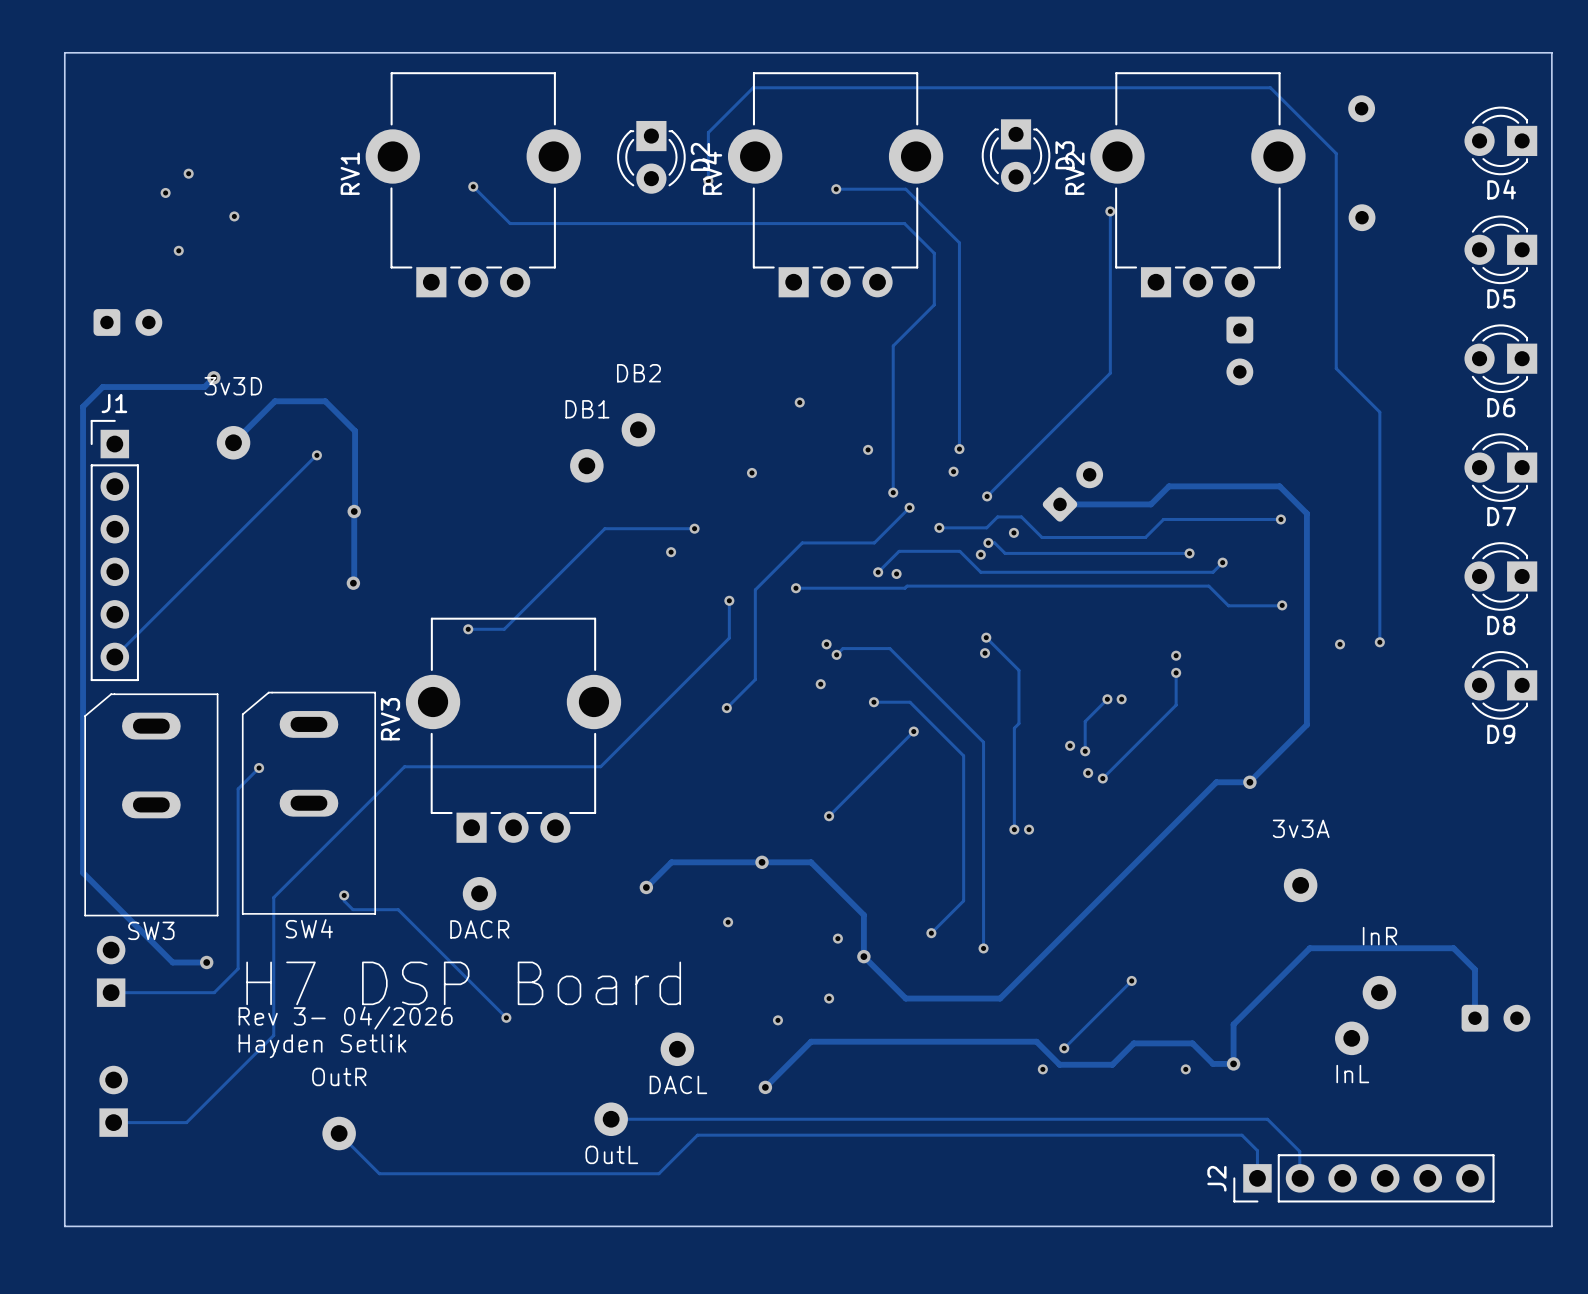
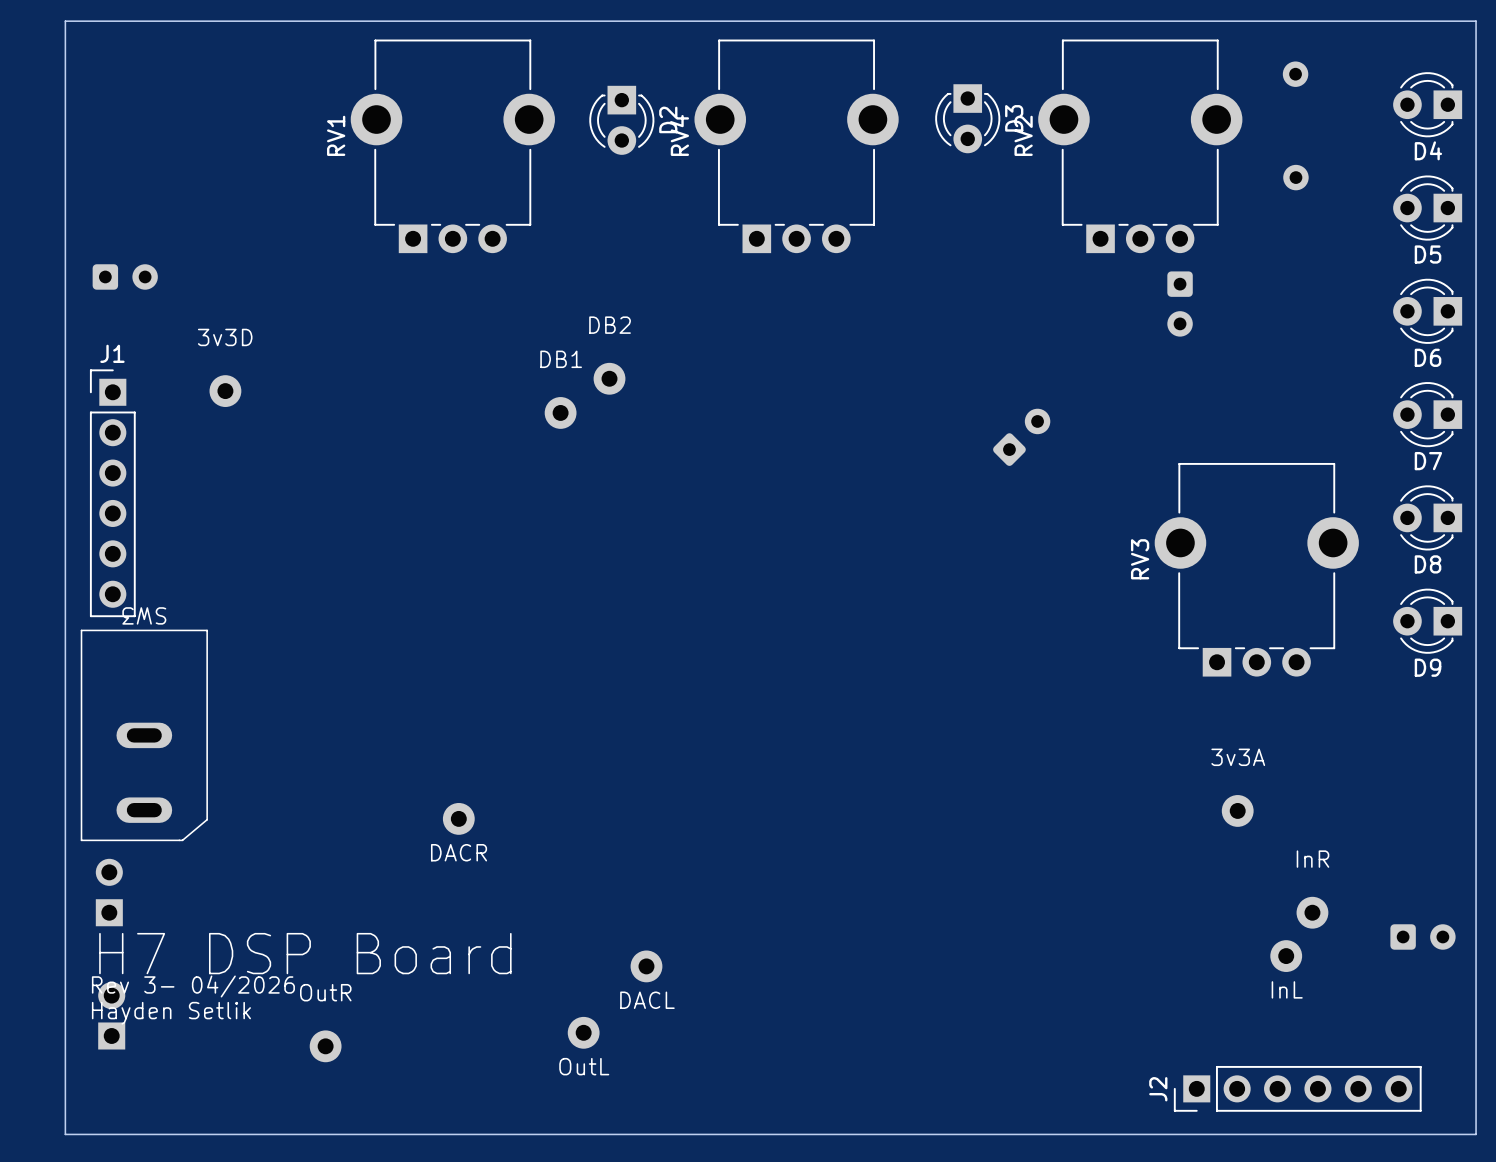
via: (188, 173) -> none
track: (708, 180) (708, 132) (753, 87) (1270, 87) (1336, 153) (1336, 368) (1379, 412) (1379, 642) -> none
via: (708, 180) -> none
track: (473, 186) (510, 223) (904, 223) (934, 253) (934, 304) (893, 345) (893, 492) -> none
via: (473, 186) -> none
track: (836, 189) (905, 189) (959, 242) (959, 449) -> none
via: (836, 189) -> none
via: (165, 192) -> none
track: (1110, 211) (1110, 373) (987, 496) -> none
via: (1110, 211) -> none
via: (234, 216) -> none
via: (178, 250) -> none
track: (213, 377) (204, 387) (102, 387) (83, 406) (83, 872) (172, 962) (206, 962) -> none
via: (213, 377) -> none
via: (799, 402) -> none
track: (233, 442) (275, 401) (325, 401) (355, 431) (353, 583) -> none
via: (868, 449) -> none
via: (959, 449) -> none
track: (316, 455) (114, 656) -> none
via: (316, 455) -> none
via: (953, 471) -> none
via: (751, 472) -> none
via: (893, 492) -> none
via: (987, 496) -> none
track: (1060, 504) (1150, 504) (1169, 486) (1279, 486) (1306, 513) (1306, 724) (1249, 782) (1216, 782) (1000, 998) (905, 998) (863, 956) (863, 915) (811, 862) (671, 862) (646, 887) -> none
track: (909, 507) (874, 542) (802, 542) (755, 589) (755, 679) (726, 708) -> none
via: (909, 507) -> none
via: (354, 511) -> none
track: (1280, 519) (1163, 519) (1145, 537) (1042, 537) (1021, 516) (997, 516) (986, 527) (939, 527) -> none
via: (1280, 519) -> none
via: (939, 527) -> none
track: (694, 528) (604, 528) (504, 629) (468, 629) -> none
via: (694, 528) -> none
via: (1013, 532) -> none
track: (988, 542) (994, 542) (1005, 553) (1189, 553) -> none
via: (988, 542) -> none
via: (671, 552) -> none
via: (1189, 553) -> none
via: (980, 554) -> none
track: (1222, 562) (1213, 572) (980, 572) (959, 551) (899, 551) (878, 572) -> none
via: (1222, 562) -> none
via: (878, 572) -> none
via: (896, 573) -> none
via: (353, 583) -> none
track: (795, 588) (904, 588) (907, 586) (1208, 586) (1228, 605) (1282, 605) -> none
via: (795, 588) -> none
track: (729, 600) (729, 638) (600, 766) (404, 766) (273, 897) (273, 1035) (186, 1122) (113, 1122) -> none
via: (729, 600) -> none
via: (1282, 605) -> none
via: (468, 629) -> none
track: (986, 637) (1018, 670) (1018, 723) (1014, 728) (1014, 829) -> none
via: (986, 637) -> none
via: (1379, 642) -> none
via: (826, 644) -> none
via: (1340, 644) -> none
via: (985, 653) -> none
track: (836, 654) (842, 648) (889, 648) (983, 742) (983, 948) -> none
via: (836, 654) -> none
via: (1176, 655) -> none
track: (1176, 672) (1176, 705) (1102, 778) -> none
via: (1176, 672) -> none
via: (820, 684) -> none
track: (1107, 699) (1085, 721) (1085, 751) -> none
via: (1107, 699) -> none
via: (1121, 699) -> none
track: (873, 702) (910, 702) (963, 755) (963, 900) (931, 933) -> none
via: (873, 702) -> none
via: (726, 708) -> none
RV3 position: (513, 730) -> (1256, 569)
track: (913, 731) (829, 816) -> none
via: (913, 731) -> none
via: (1070, 745) -> none
via: (1085, 751) -> none
track: (259, 768) (238, 788) (238, 968) (214, 992) (111, 992) -> none
via: (259, 768) -> none
via: (1088, 773) -> none
via: (1102, 778) -> none
via: (1249, 782) -> none
SW4: (308, 803) -> none
SW3 rotation: 0° (151, 804) -> 180° (144, 735)
via: (829, 816) -> none
via: (1014, 829) -> none
via: (1029, 829) -> none
via: (762, 862) -> none
via: (646, 887) -> none
track: (344, 895) (344, 900) (352, 909) (398, 909) (506, 1017) -> none
via: (344, 895) -> none
via: (728, 922) -> none
via: (931, 933) -> none
via: (837, 938) -> none
via: (983, 948) -> none
via: (863, 956) -> none
via: (206, 962) -> none
track: (1131, 980) (1064, 1048) -> none
via: (1131, 980) -> none
text position: H7 DSP Board (463, 983) -> H7 DSP Board (305, 953)
via: (829, 998) -> none
via: (506, 1017) -> none
text position: Rev 3- 04/2026 (345, 1018) -> Rev 3- 04/2026 (193, 986)
track: (1474, 1018) (1474, 969) (1453, 948) (1309, 948) (1233, 1024) (1233, 1063) (1213, 1063) (1192, 1043) (1133, 1043) (1112, 1064) (1059, 1064) (1036, 1041) (811, 1041) (765, 1087) -> none
via: (777, 1020) -> none
text position: Hayden Setlik (322, 1046) -> Hayden Setlik (171, 1013)
via: (1064, 1048) -> none
via: (1233, 1063) -> none
via: (1042, 1069) -> none
via: (1185, 1069) -> none
via: (765, 1087) -> none
track: (611, 1119) (1267, 1119) (1299, 1151) (1300, 1178) -> none
track: (339, 1133) (379, 1173) (658, 1173) (697, 1135) (1241, 1135) (1257, 1150) (1257, 1178) -> none

